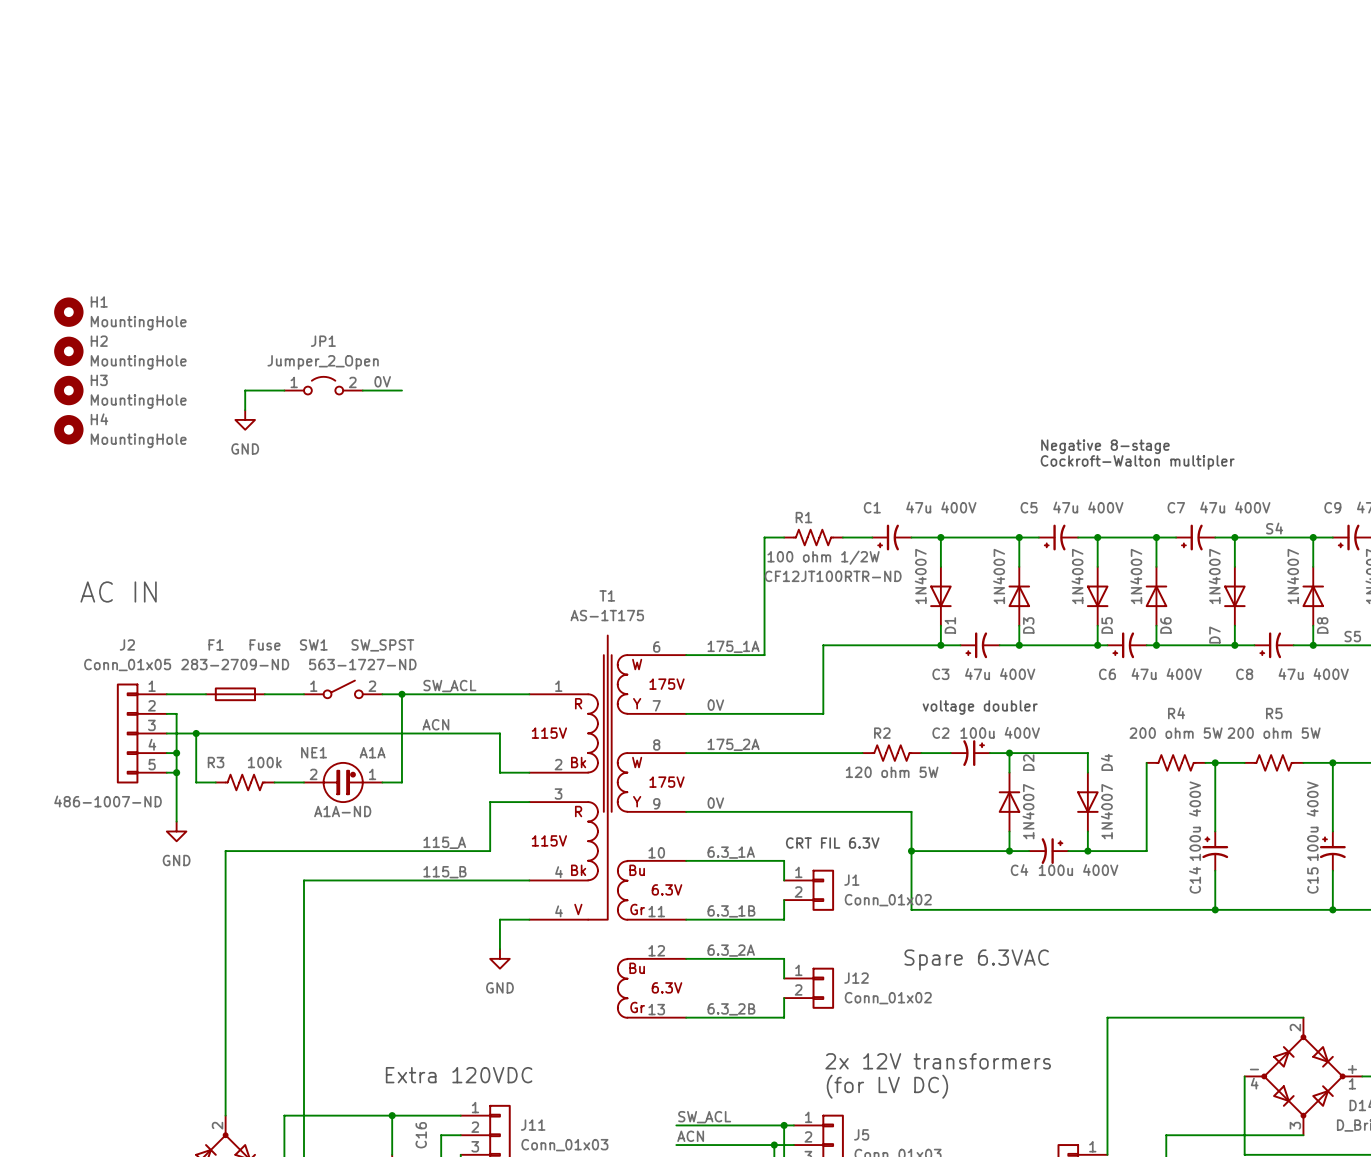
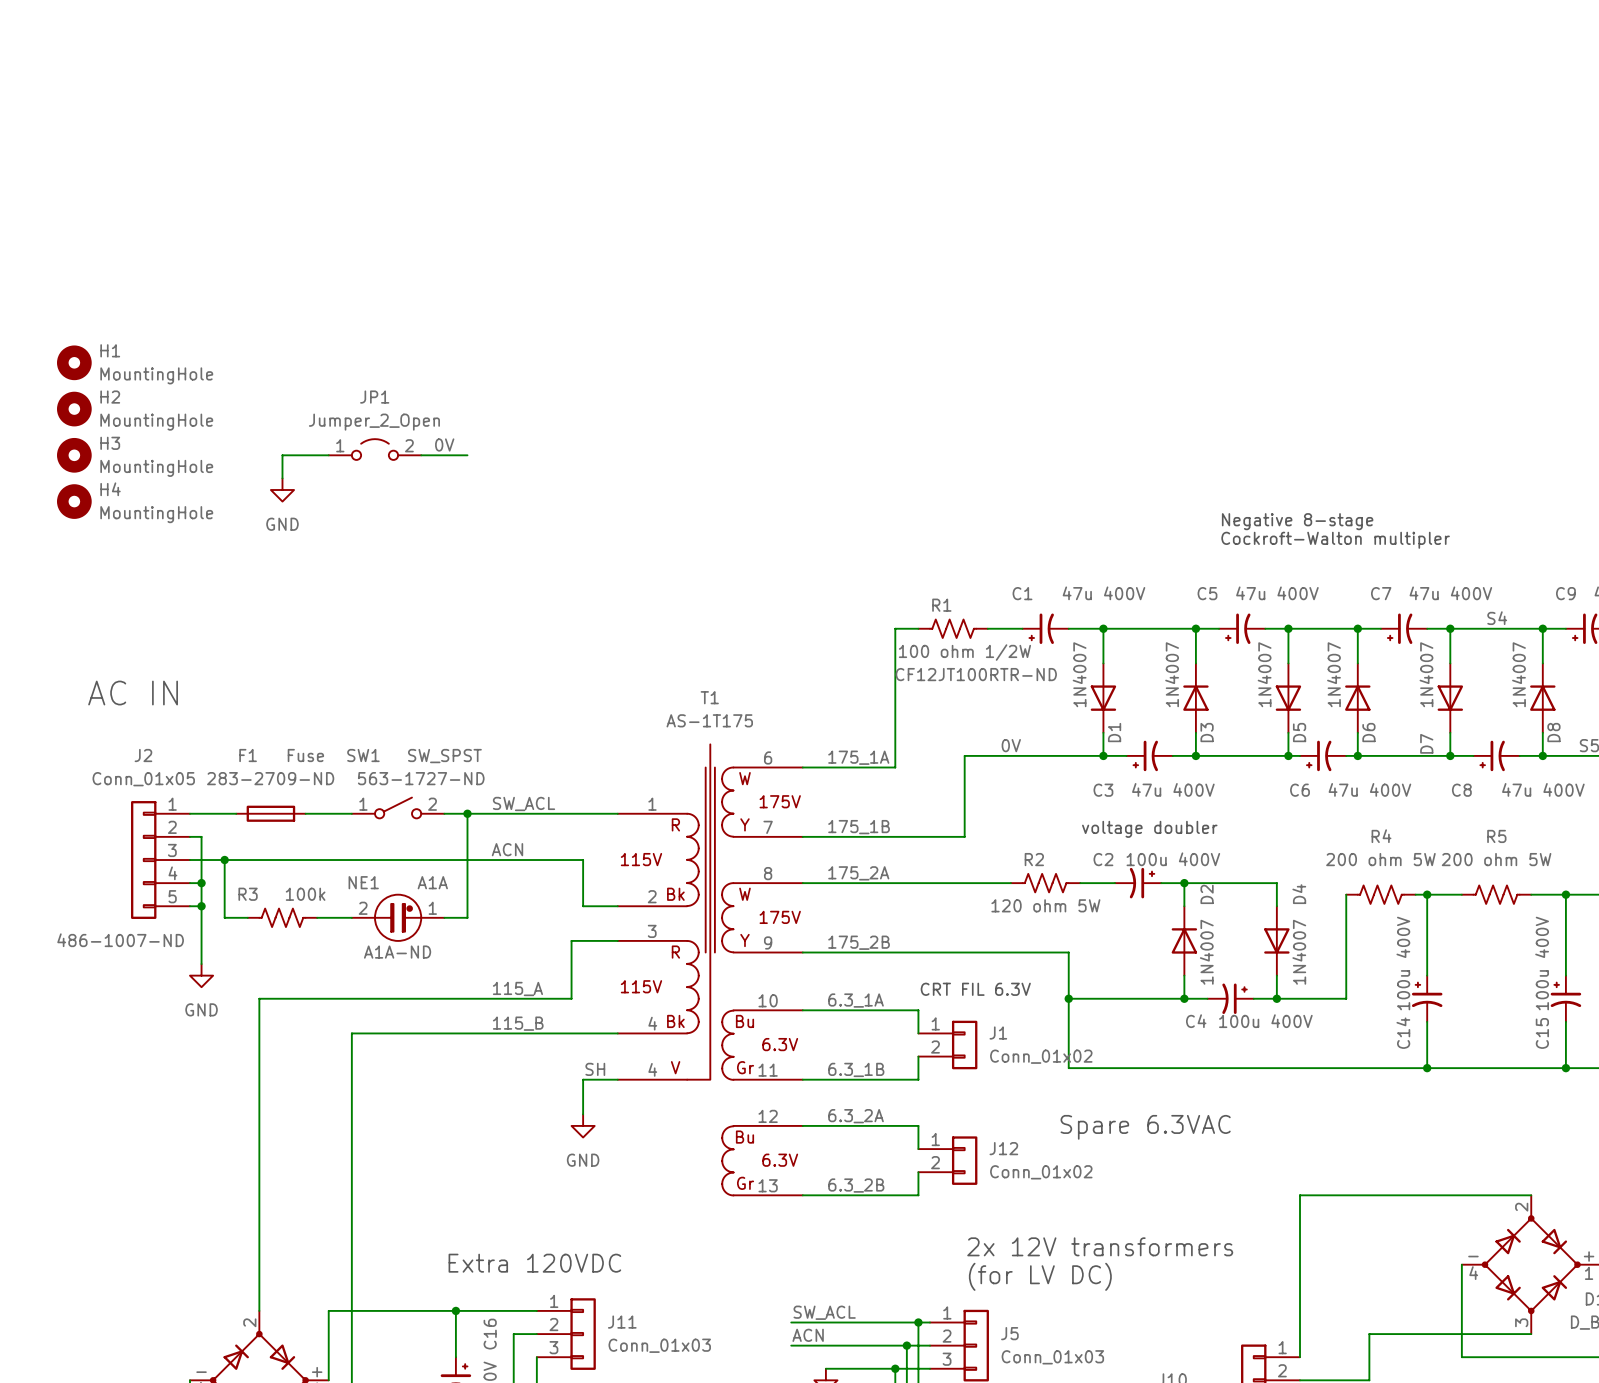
label: none -> 0V (1011, 745)
label: 0V (715, 705) -> 175_1B (859, 827)
label: 0V (715, 803) -> 175_2B (859, 942)
label: none -> SH (595, 1069)

